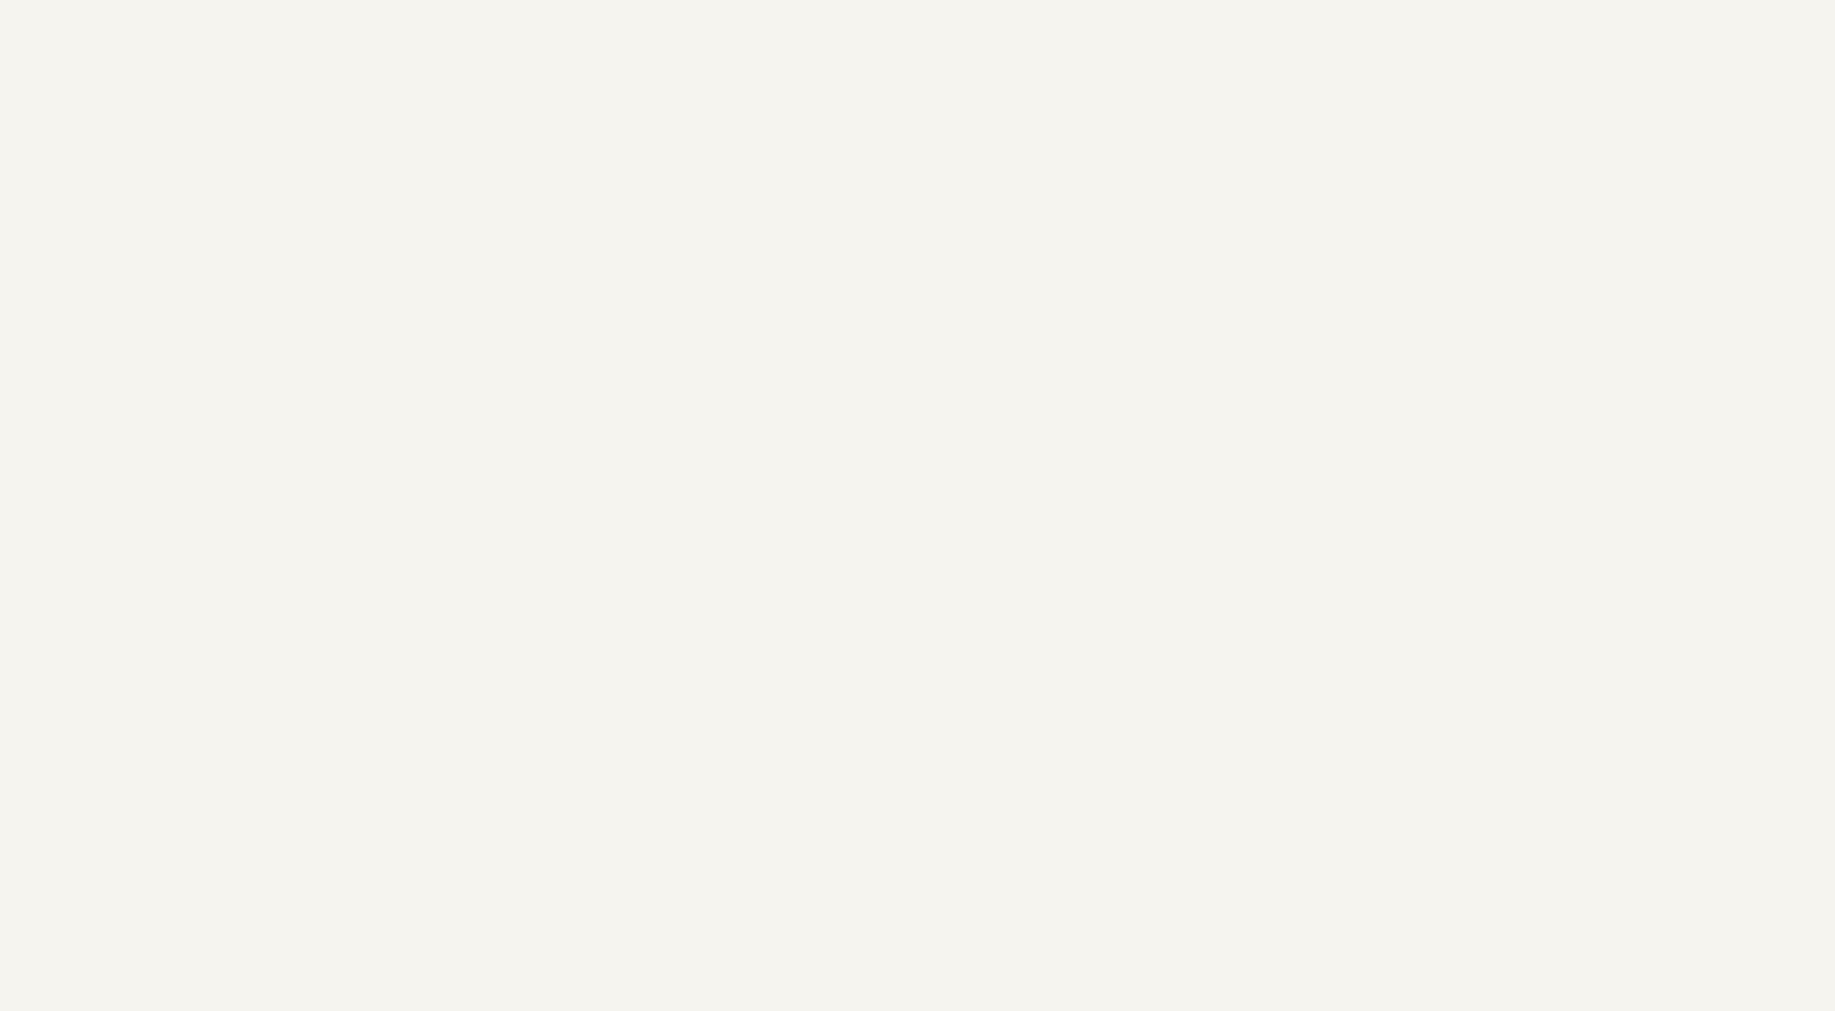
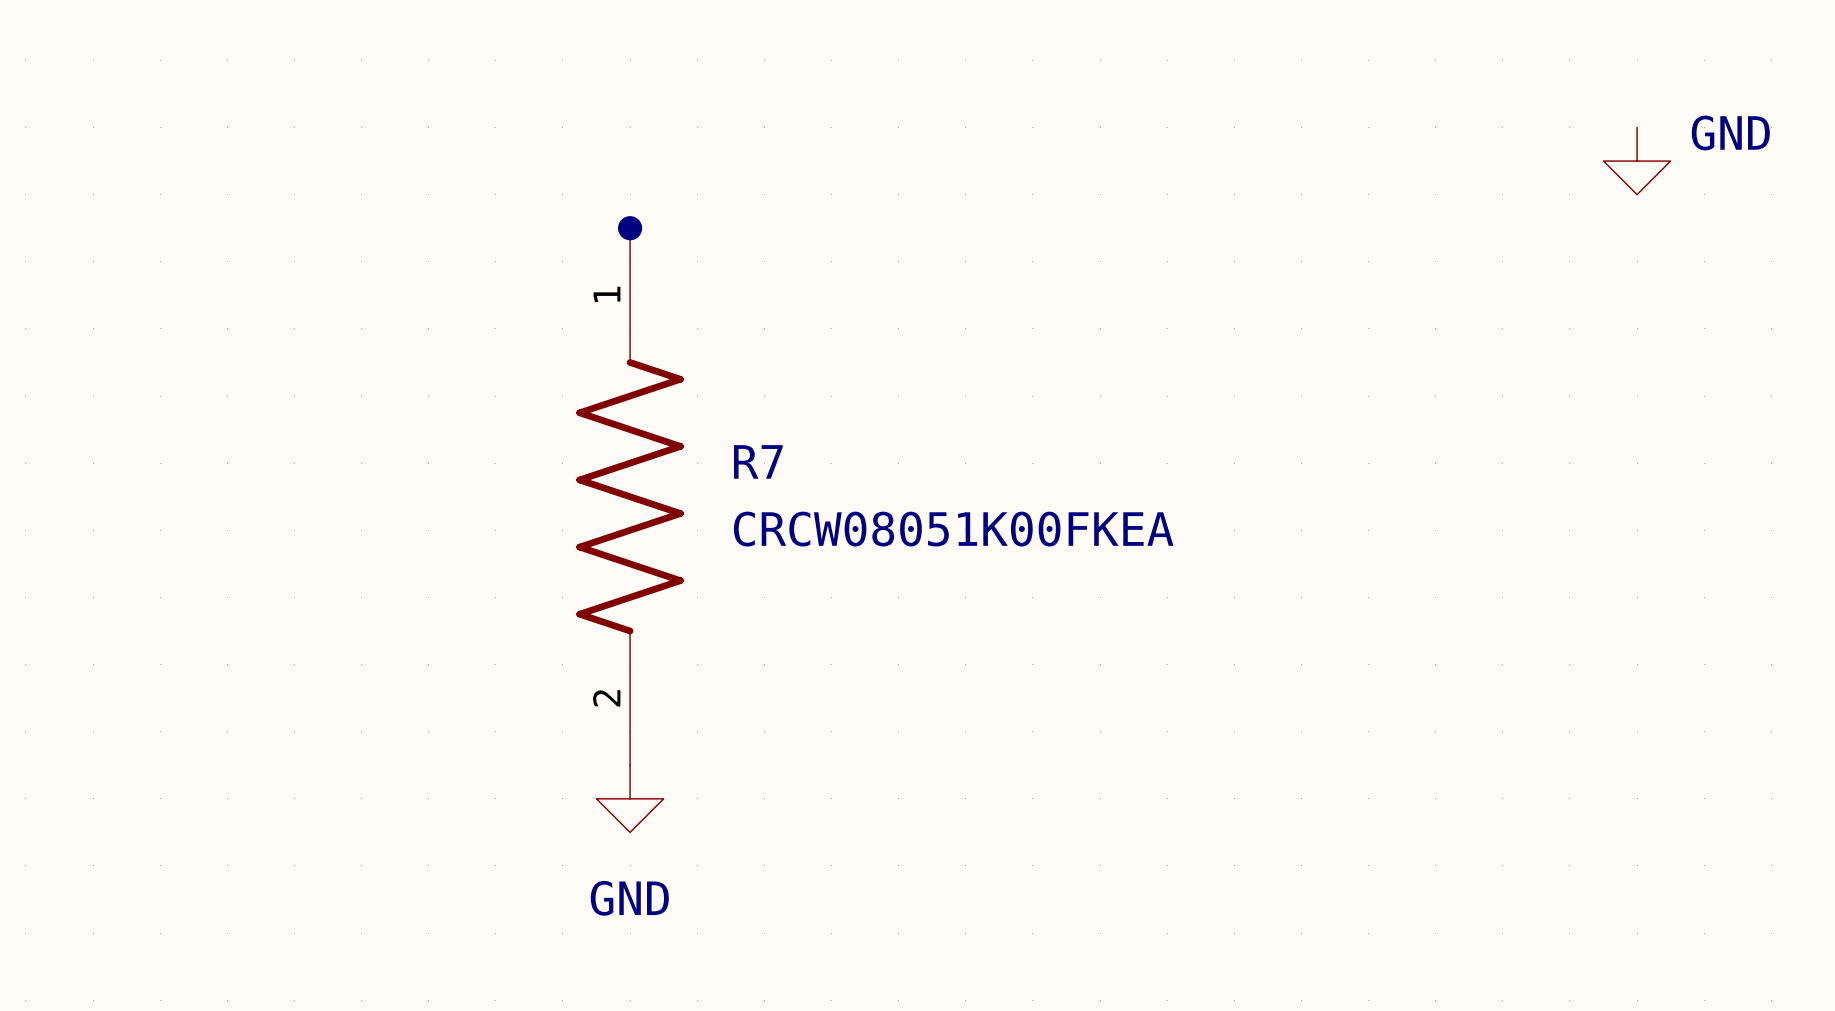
power symbol: none -> GND (1637, 161)
junction: none -> (630, 228)
R7: none -> CRCW08051K00FKEA (630, 496)
power symbol: none -> GND (630, 798)

